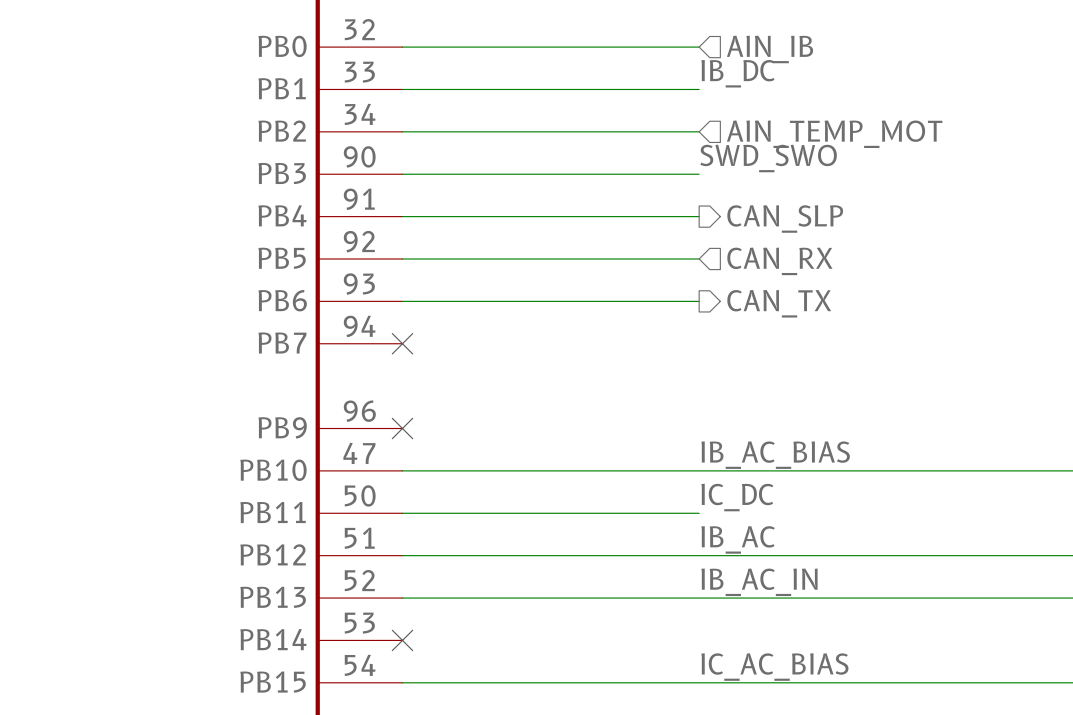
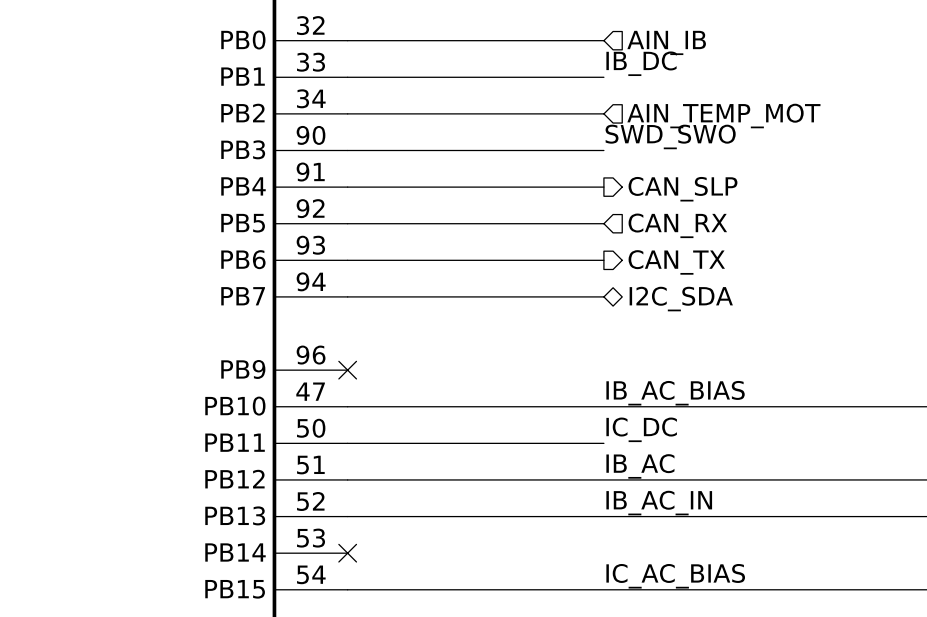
wire: none -> (347, 296) (603, 296)
no-connect mark: (402, 343) -> none
hierarchical label: none -> I2C_SDA (681, 299)

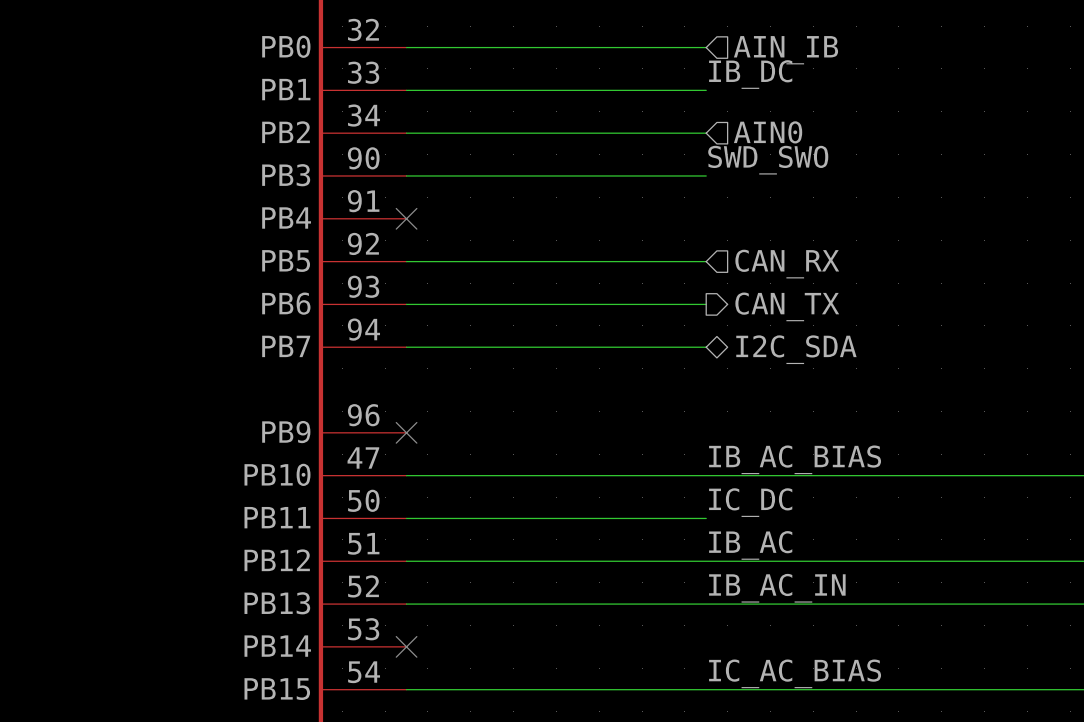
hierarchical label: AIN_TEMP_MOT (723, 116) -> AIN0 (768, 132)
wire: (347, 187) (603, 187) -> none
no-connect mark: none -> (406, 218)
hierarchical label: CAN_SLP (683, 189) -> none

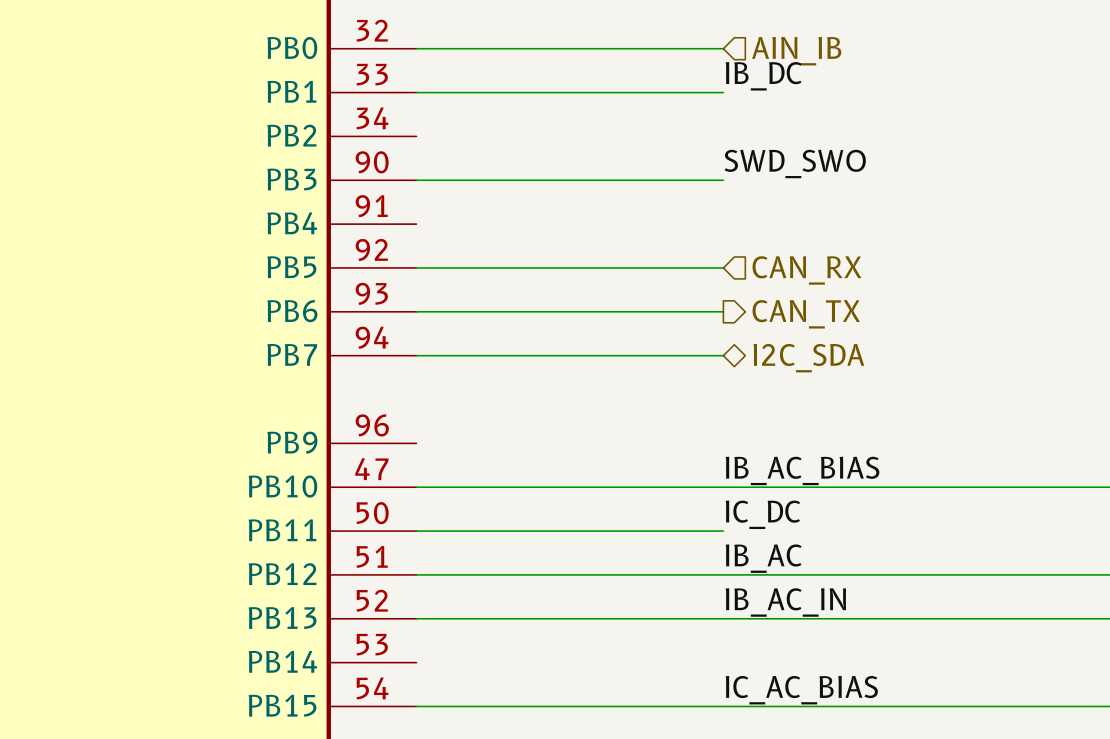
hierarchical label: AIN0 (768, 132) -> none
wire: (406, 133) (706, 133) -> none
no-connect mark: (406, 218) -> none
no-connect mark: (406, 432) -> none
no-connect mark: (406, 646) -> none

